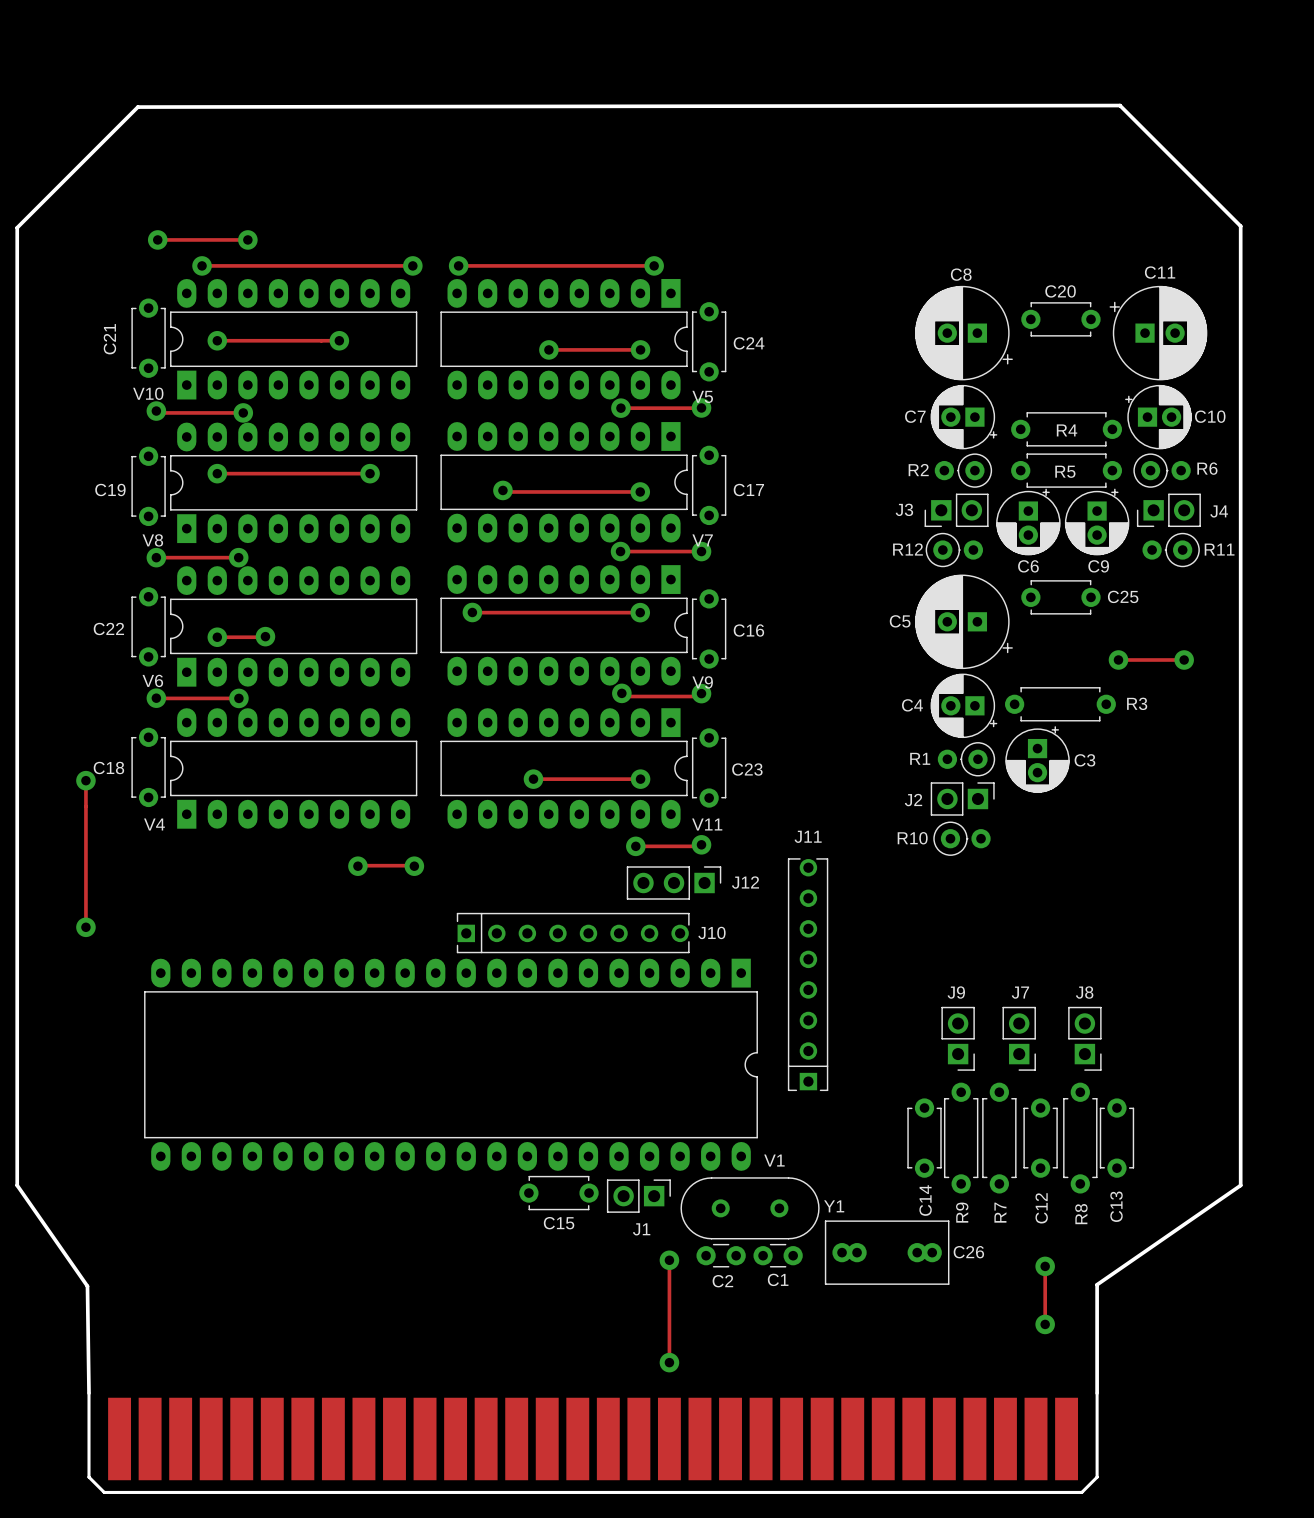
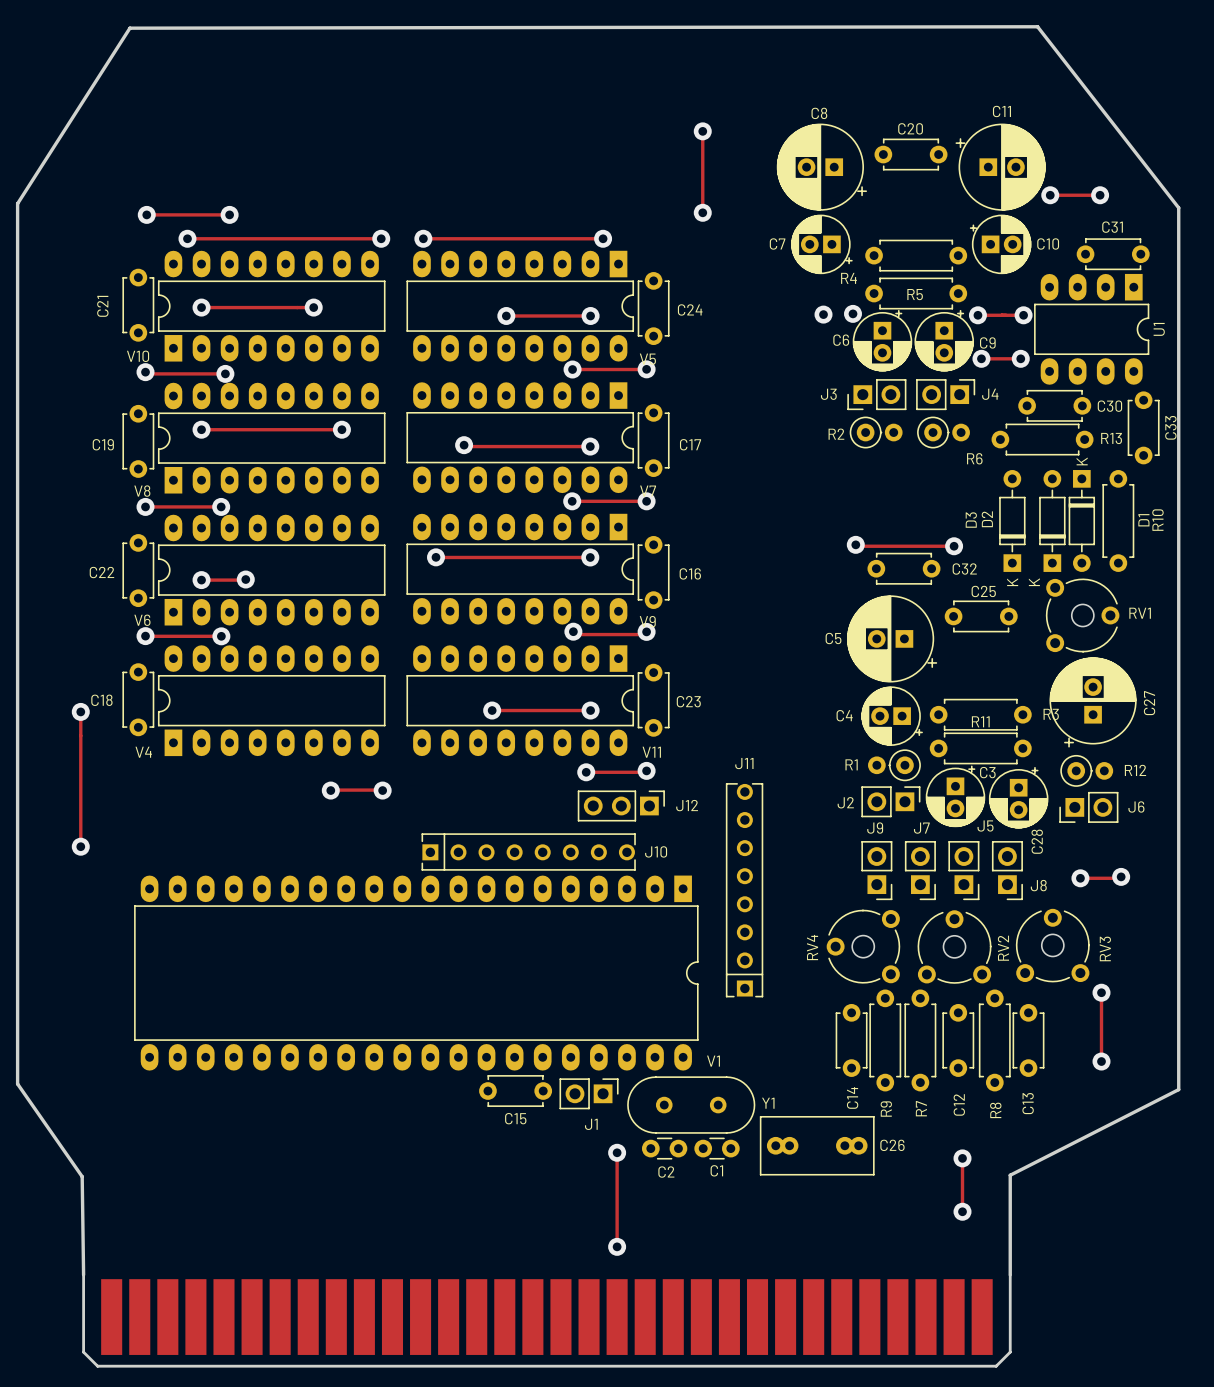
track: none -> (702, 131) (702, 212)
via: none -> (702, 131)
track: none -> (1050, 195) (1100, 195)
via: none -> (1050, 195)
via: none -> (1100, 195)
board edge: (17, 227) (137, 107) (1120, 105) (1240, 226) (1240, 1185) (1097, 1284) -> (17, 203) (129, 28) (1037, 26) (1178, 207) (1178, 1089) (1010, 1175)
via: none -> (702, 212)
C31: none -> (1113, 254)
C20 position: (1060, 319) -> (911, 154)
C8 position: (964, 333) -> (821, 167)
C11 position: (1158, 333) -> (1000, 167)
via: none -> (852, 313)
via: none -> (823, 314)
via: none -> (977, 315)
track: none -> (978, 315) (1023, 315)
via: none -> (1023, 315)
U1: none -> (1091, 329)
track: none -> (981, 358) (1020, 358)
via: none -> (981, 358)
via: none -> (1020, 358)
C7 position: (964, 417) -> (821, 244)
C10 position: (1158, 417) -> (1000, 244)
R4 position: (1066, 429) -> (916, 255)
R4 name position: R4 (1067, 430) -> R4 (849, 278)
C30: none -> (1054, 405)
R6 name position: R6 (1207, 468) -> R6 (974, 458)
R2 rotation: 0° (963, 470) -> 180° (876, 432)
R5 position: (1066, 470) -> (916, 293)
R6 position: (1162, 470) -> (943, 432)
C33: none -> (1143, 427)
R13: none -> (1042, 439)
J3 position: (956, 510) -> (876, 394)
J4 rotation: 0° (1168, 510) -> 180° (945, 394)
J4 position: (1168, 510) -> (945, 394)
C6 position: (1028, 521) -> (882, 340)
C9 position: (1097, 521) -> (944, 340)
R11 footprint: [1142, 532, 1200, 568] -> [929, 732, 1032, 765]
R12 name position: R12 (907, 549) -> R12 (1135, 770)
R11 name position: R11 (1219, 549) -> R11 (980, 721)
R12 position: (954, 550) -> (1086, 770)
C6 name position: C6 (1028, 566) -> C6 (841, 340)
C9 name position: C9 (1098, 566) -> C9 (987, 342)
D3: none -> (1012, 520)
D2: none -> (1052, 520)
D1: none -> (1081, 520)
C25 name position: C25 (1123, 596) -> C25 (983, 591)
C25 position: (1060, 597) -> (981, 616)
track: none -> (855, 544) (954, 546)
via: none -> (855, 544)
via: none -> (954, 546)
C5 position: (964, 621) -> (892, 638)
C32: none -> (903, 568)
track: (1118, 659) (1184, 659) -> none
via: (1118, 659) -> none
via: (1184, 659) -> none
RV1: none -> (1082, 615)
R3 position: (1060, 704) -> (980, 714)
C4 position: (964, 705) -> (892, 716)
R1 position: (966, 759) -> (894, 765)
C3 position: (1037, 759) -> (955, 796)
C3 name position: C3 (1084, 760) -> C3 (987, 772)
C27: none -> (1093, 702)
J2 position: (962, 798) -> (890, 801)
R10 footprint: [933, 821, 991, 856] -> [1102, 470, 1135, 572]
R10 name position: R10 (912, 838) -> R10 (1157, 520)
C28: none -> (1018, 797)
J6: none -> (1088, 807)
J5: none -> (963, 870)
track: none -> (1121, 876) (1080, 878)
via: none -> (1121, 876)
via: none -> (1080, 878)
J8 name position: J8 (1084, 992) -> J8 (1038, 885)
RV3: none -> (1052, 945)
RV4: none -> (863, 946)
RV2: none -> (954, 946)
J9 position: (958, 1038) -> (876, 870)
J7 position: (1019, 1038) -> (920, 870)
J8 position: (1084, 1038) -> (1007, 870)
track: none -> (1101, 992) (1101, 1061)
via: none -> (1101, 992)
via: none -> (1101, 1061)

